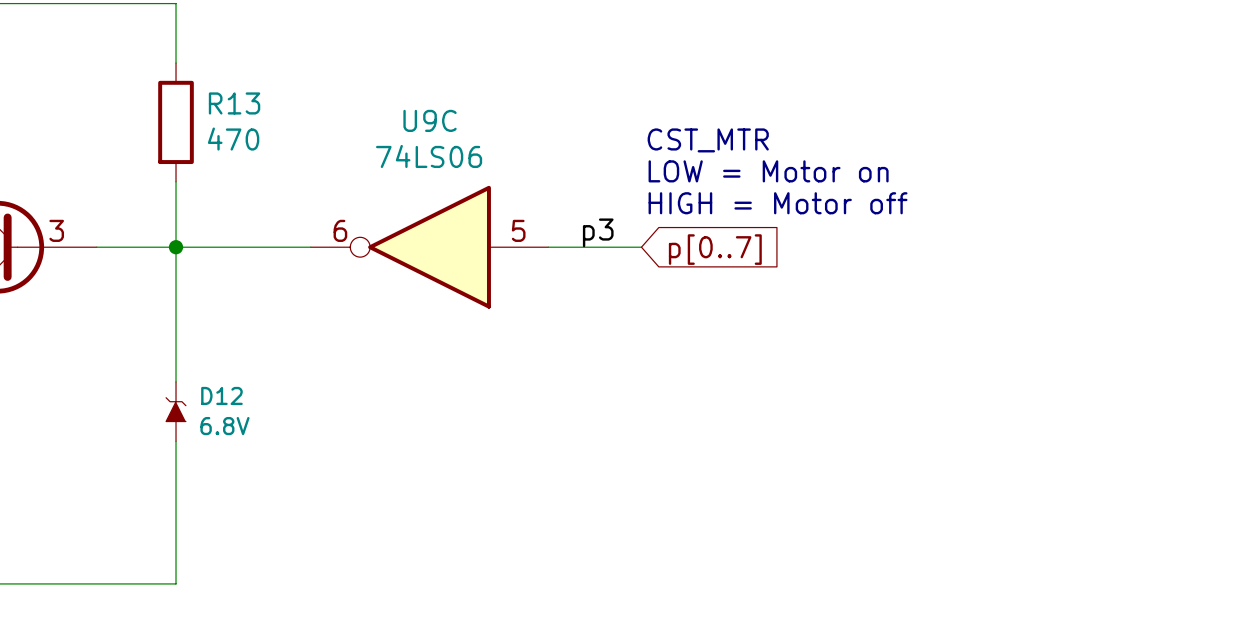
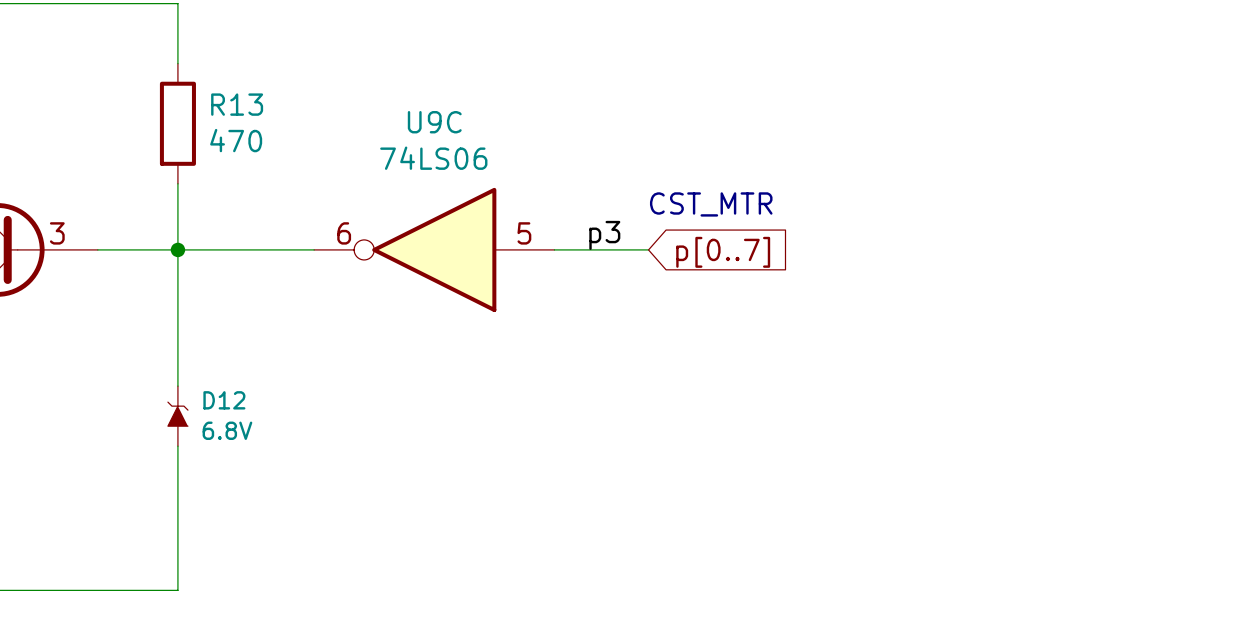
text position: CST_MTR (708, 140) -> CST_MTR (711, 204)
text: LOW = Motor on (768, 171) -> none
text: HIGH = Motor off (778, 203) -> none

